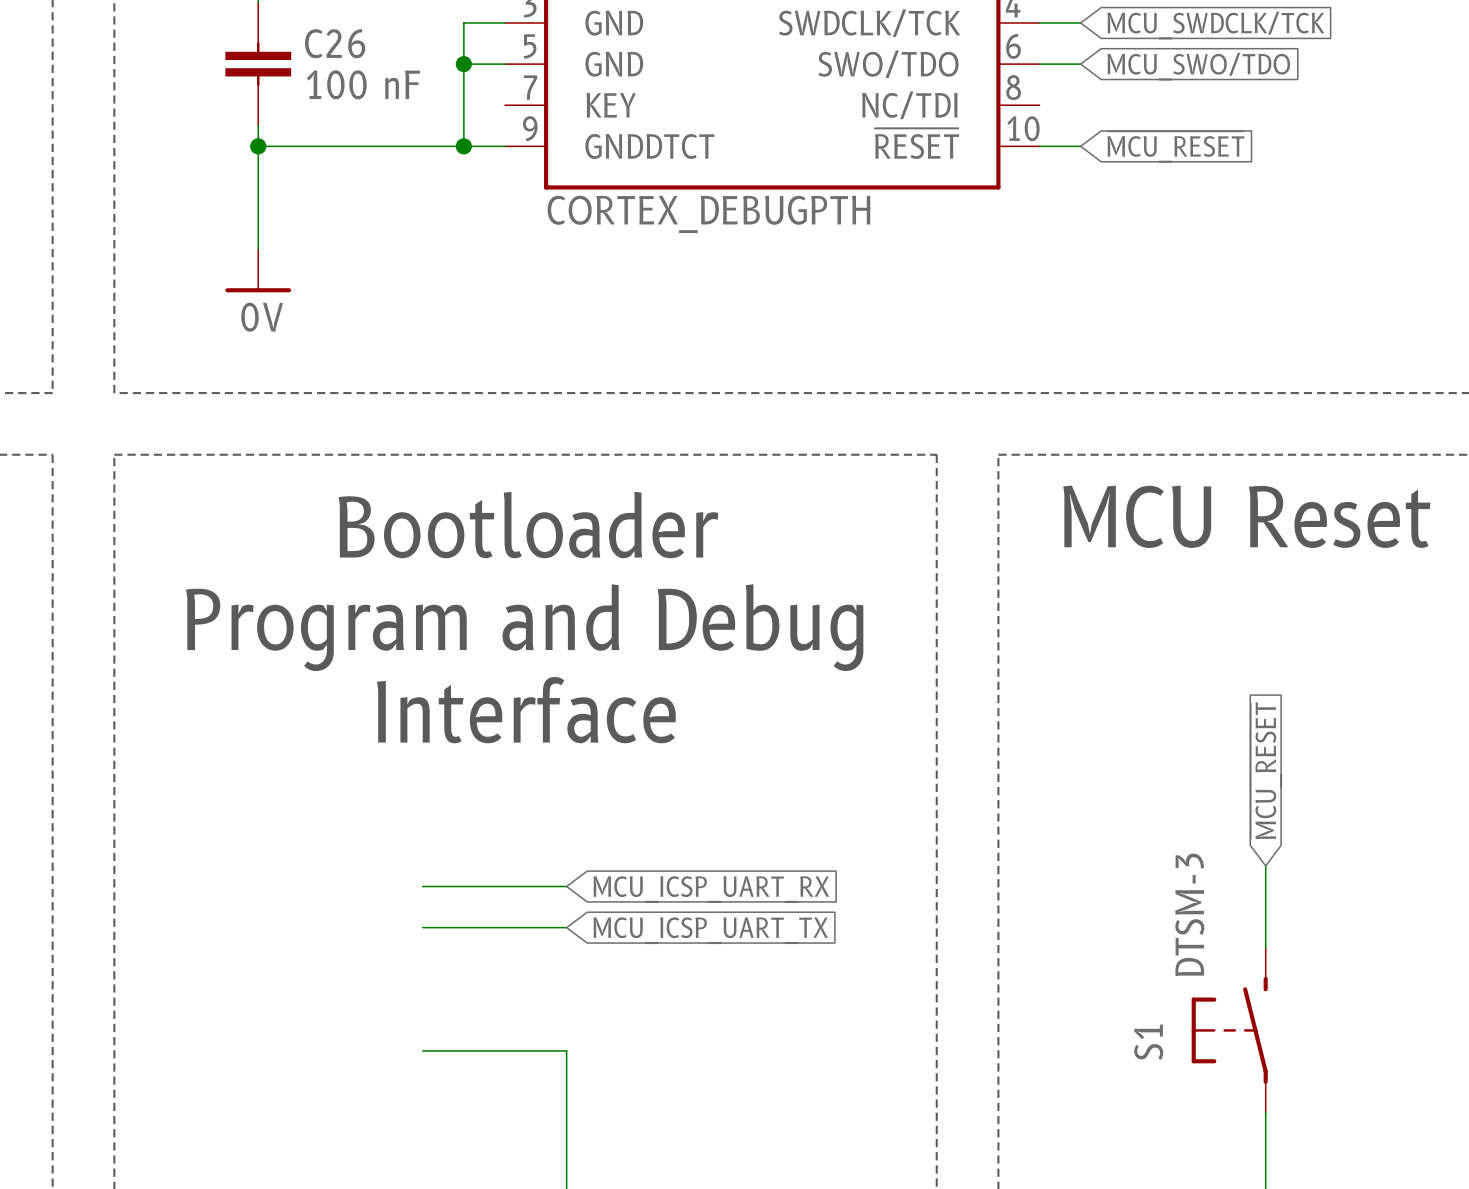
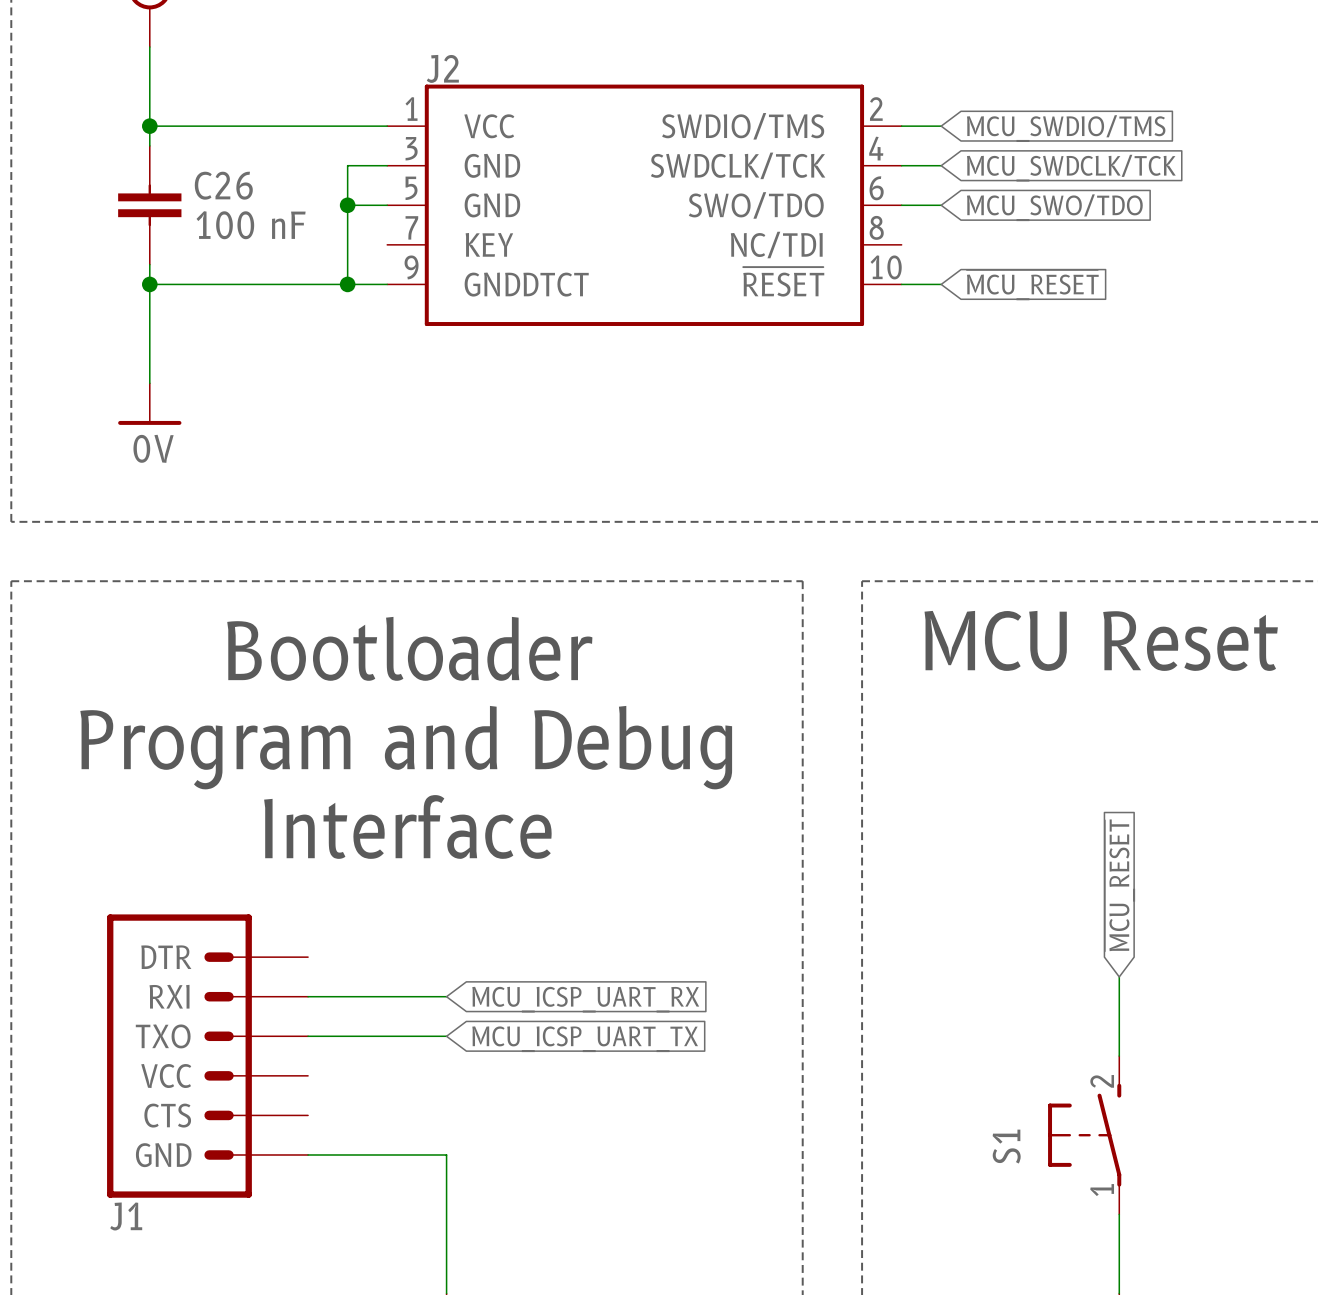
J2 value: CORTEX_DEBUGPTH (708, 214) -> none
S1 value: DTSM-3 (1189, 914) -> none
J1: none -> (207, 1056)
S1 pin number: none -> 2 (1102, 1081)
S1 pin number: none -> 1 (1102, 1190)

